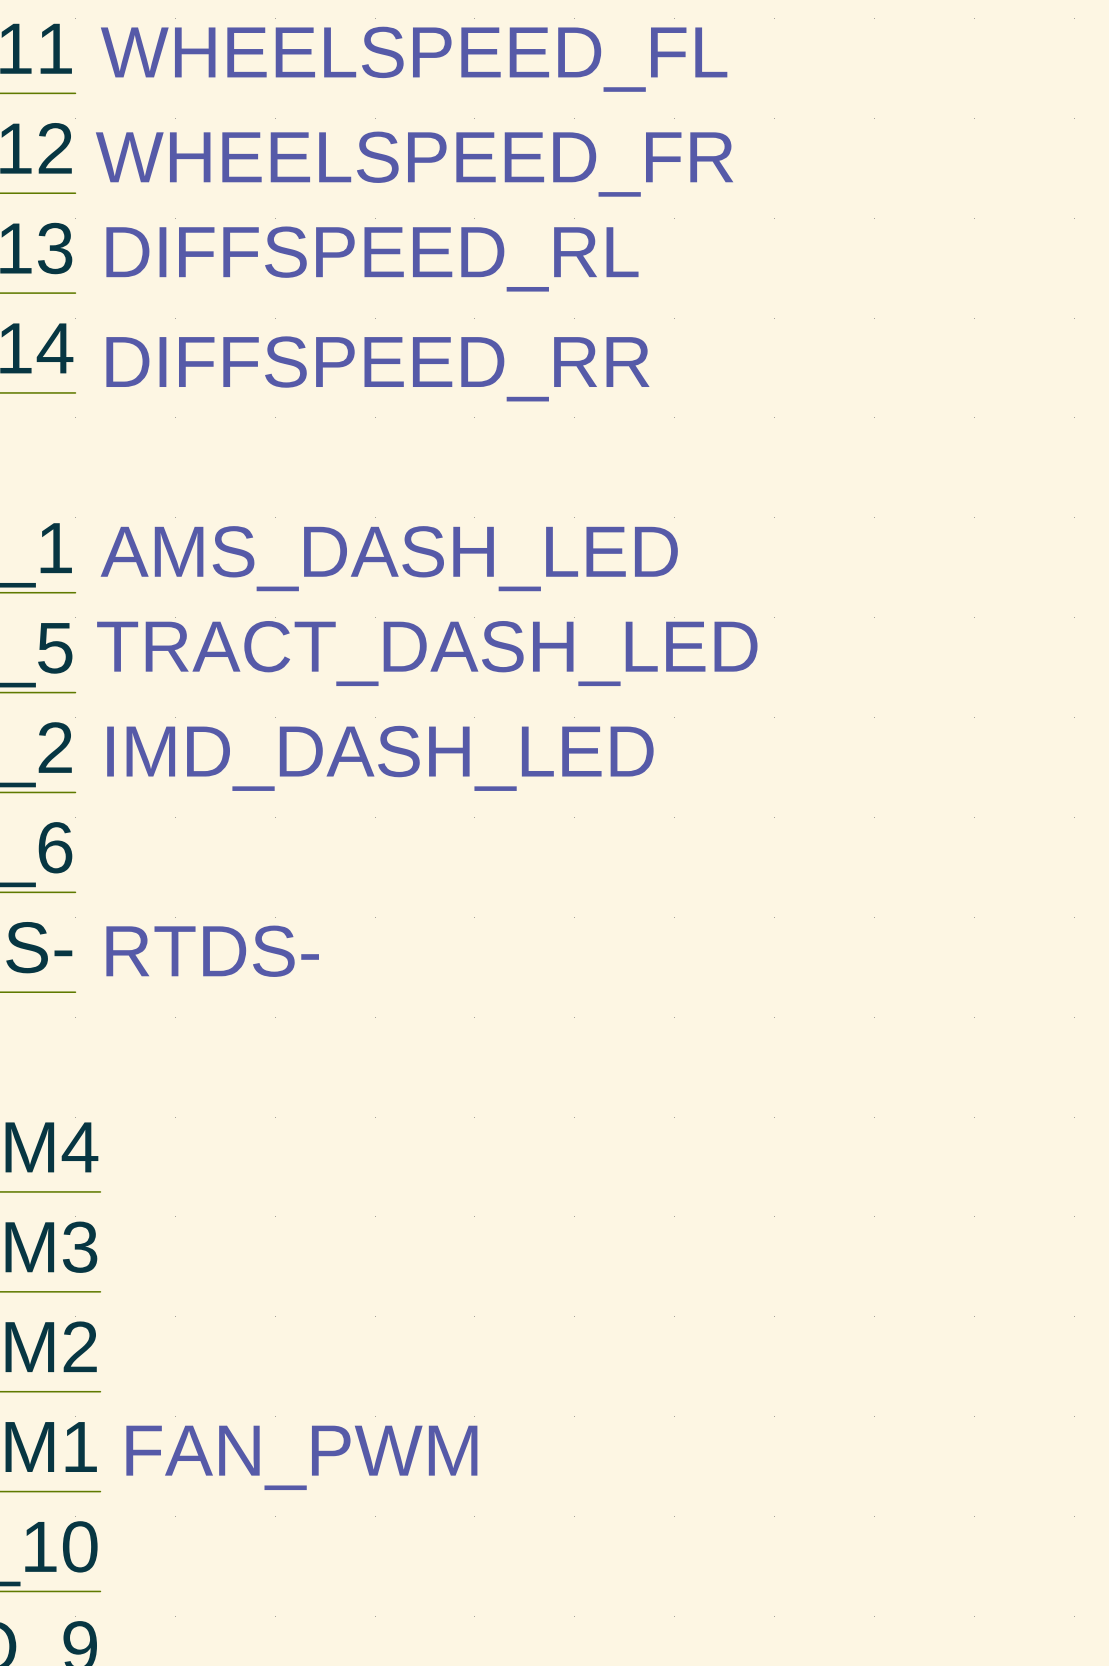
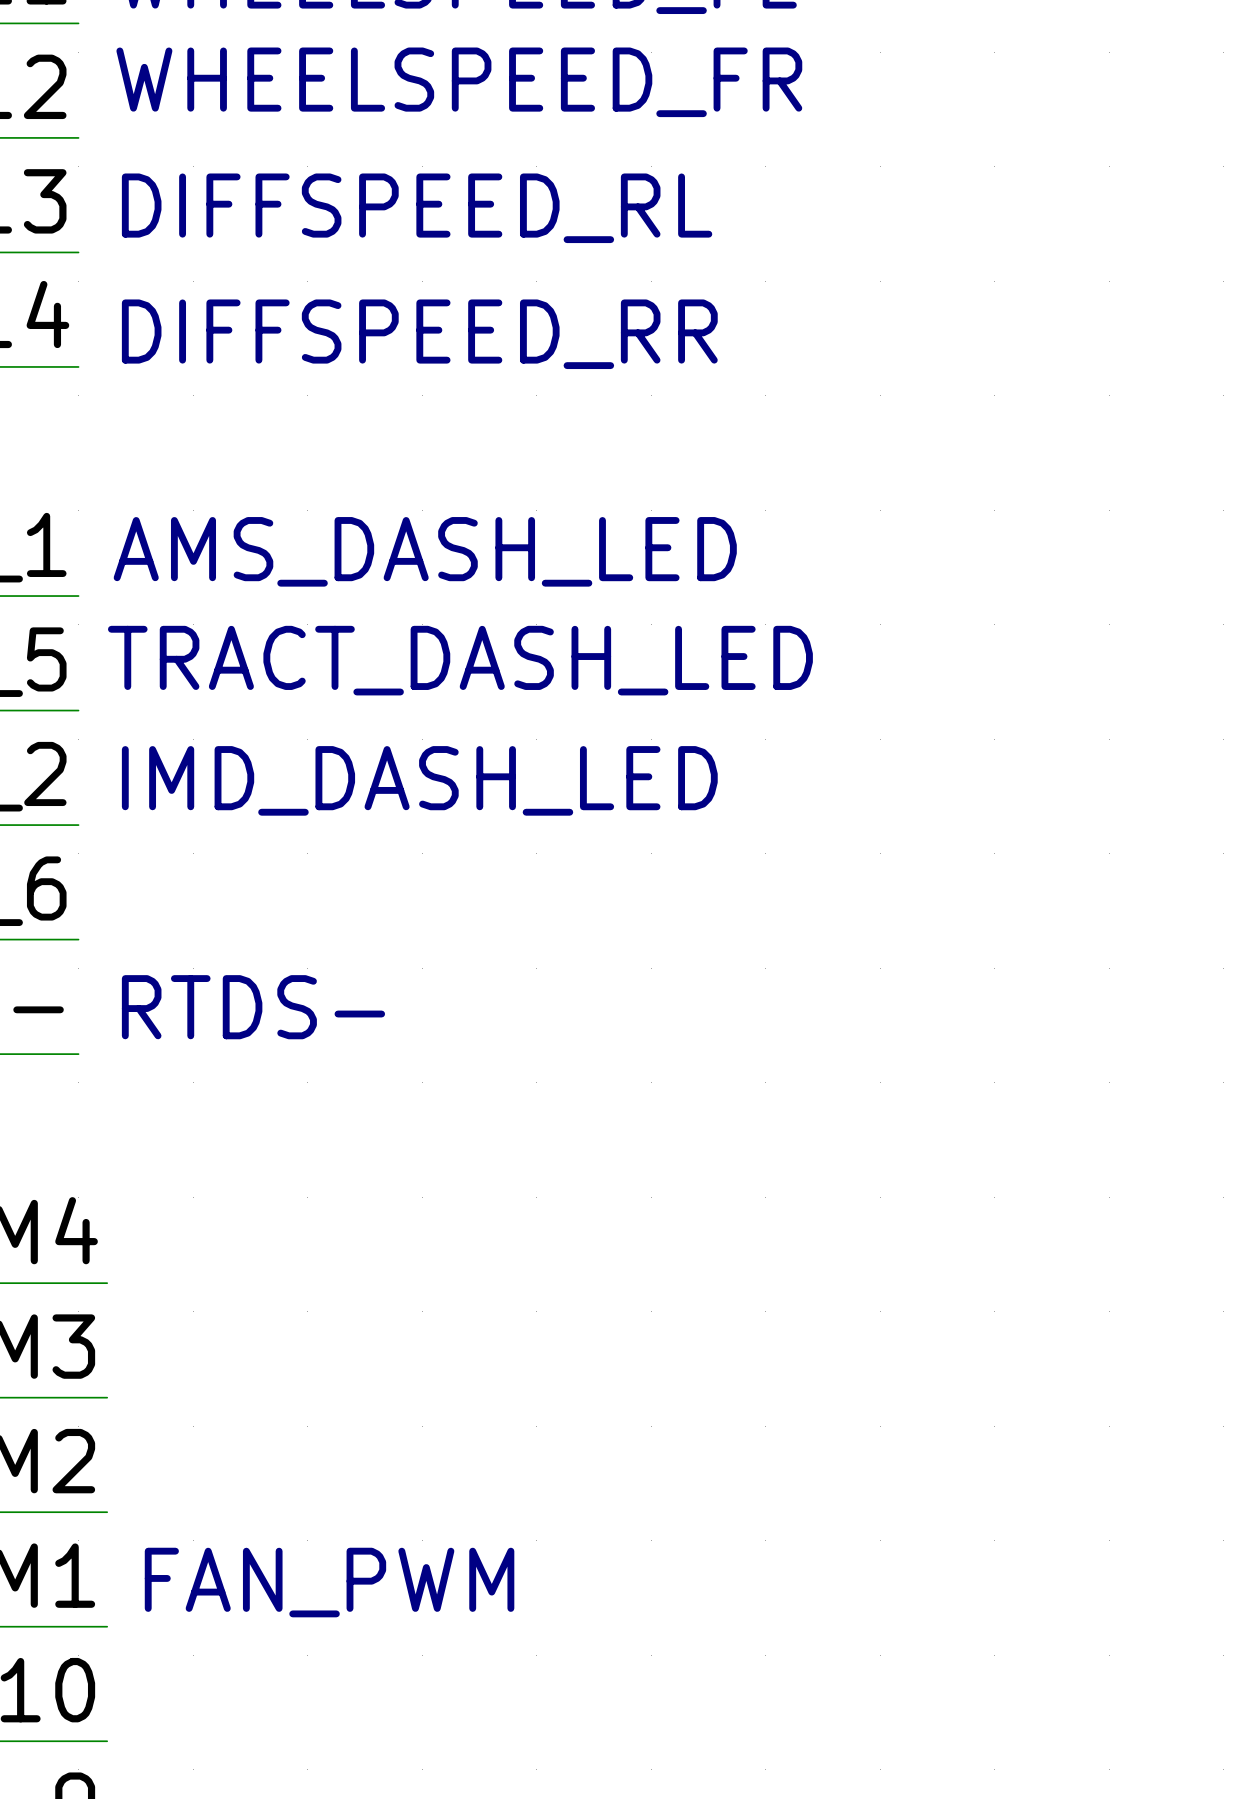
text position: WHEELSPEED_FR (414, 164) -> WHEELSPEED_FR (459, 82)

